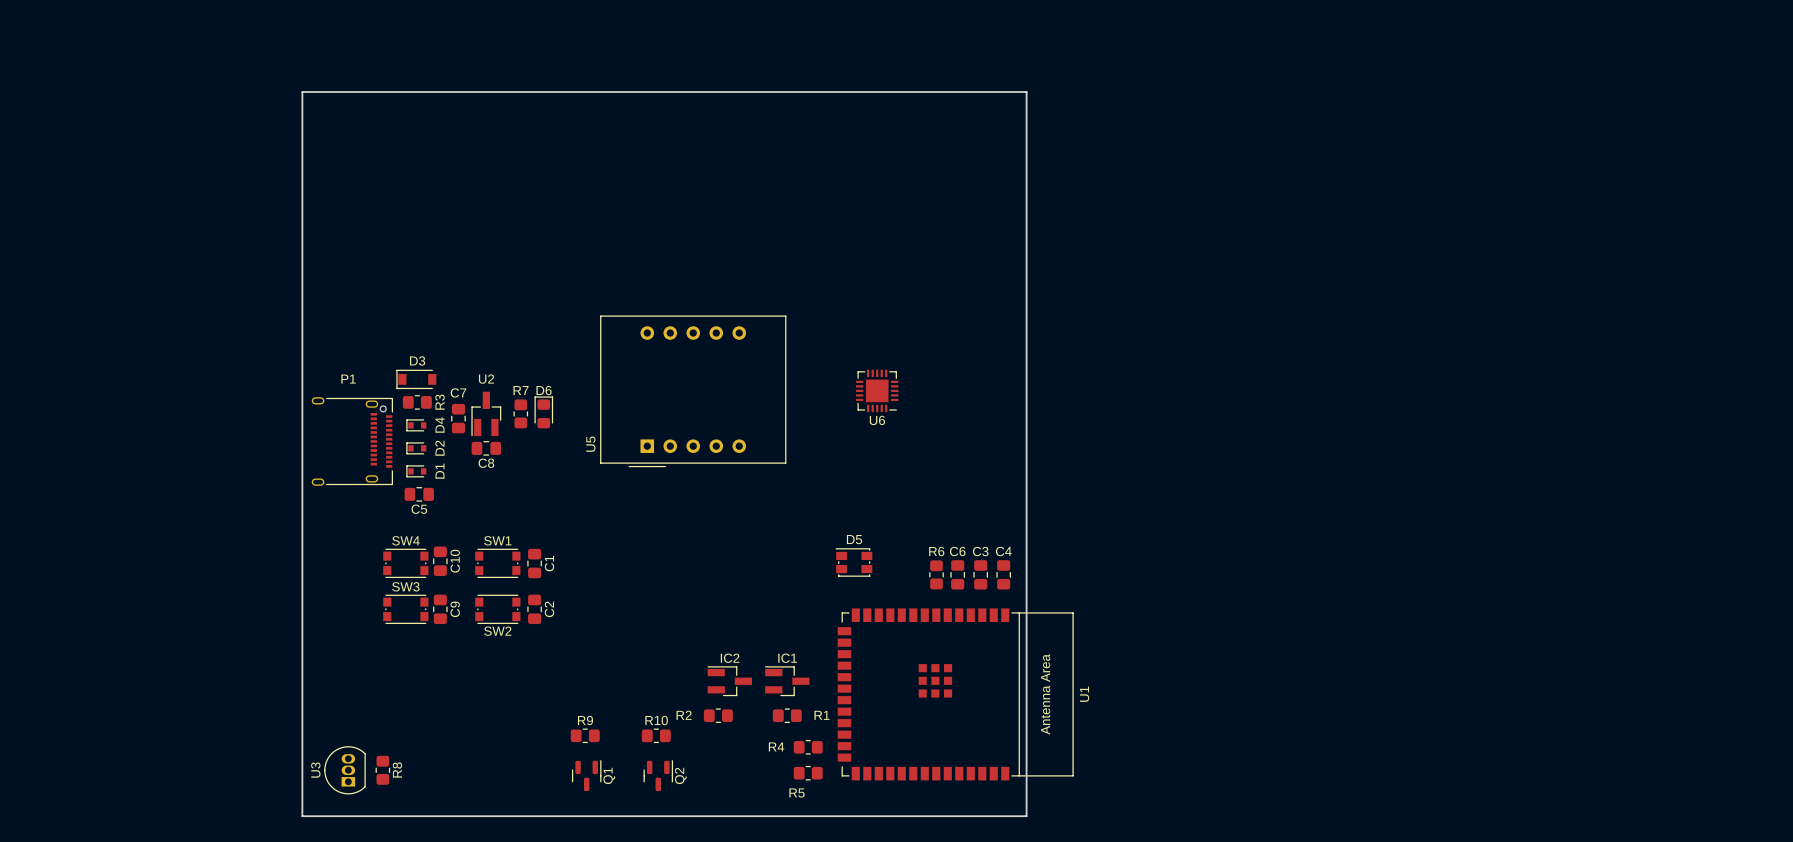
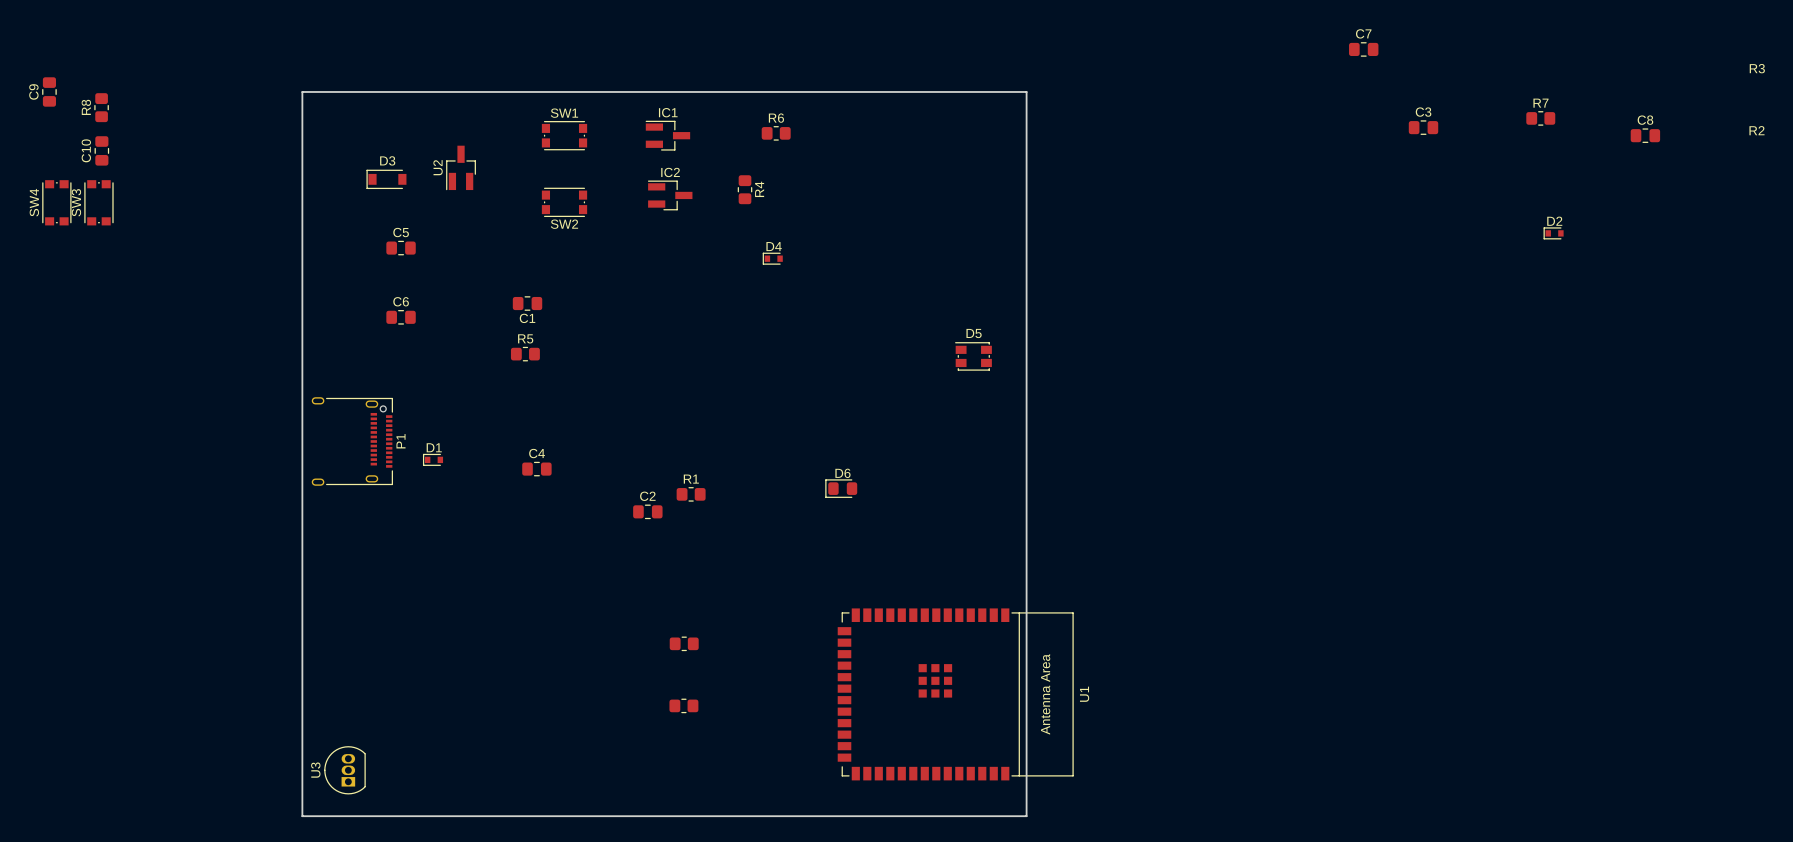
P1 name rotation: 0° (348, 379) -> 90° counterclockwise (401, 441)
P1 name position: P1 (348, 379) -> P1 (401, 441)
D3 position: (416, 379) -> (386, 179)
U2 name rotation: 0° (486, 379) -> 90° counterclockwise (438, 167)
U2 name position: U2 (486, 379) -> U2 (438, 167)
U6: (877, 390) -> none
U5: (693, 391) -> none
R3 position: (417, 402) -> (684, 643)
R3 name rotation: 0° (439, 402) -> 90° clockwise (1757, 68)
R3 name position: R3 (439, 402) -> R3 (1757, 68)
D6 rotation: 0° (543, 412) -> 90° counterclockwise (841, 488)
D6 position: (543, 412) -> (841, 488)
U2 position: (486, 413) -> (461, 167)
R7 rotation: 0° (520, 413) -> 90° clockwise (1540, 118)
R7 position: (520, 413) -> (1540, 118)
C7 rotation: 0° (458, 418) -> 90° clockwise (1363, 49)
C7 position: (458, 418) -> (1363, 49)
D4 position: (416, 425) -> (772, 258)
D4 name rotation: 0° (440, 425) -> 90° clockwise (774, 246)
D4 name position: D4 (440, 425) -> D4 (774, 246)
D2 position: (416, 448) -> (1553, 233)
D2 name rotation: 0° (439, 448) -> 90° clockwise (1554, 221)
D2 name position: D2 (439, 448) -> D2 (1554, 221)
C8 position: (486, 448) -> (1645, 135)
C8 name position: C8 (486, 463) -> C8 (1645, 120)
D1 position: (416, 471) -> (433, 459)
D1 name rotation: 0° (440, 471) -> 90° clockwise (434, 447)
D1 name position: D1 (440, 471) -> D1 (434, 447)
C5 position: (419, 494) -> (401, 248)
C5 name position: C5 (419, 509) -> C5 (401, 232)
SW4 name position: SW4 (405, 540) -> SW4 (34, 202)
C10 position: (440, 561) -> (101, 150)
C10 name position: C10 (455, 561) -> C10 (86, 150)
D5 position: (853, 562) -> (973, 356)
SW4 rotation: 0° (405, 563) -> 90° clockwise (56, 202)
SW4 position: (405, 563) -> (56, 202)
SW1 position: (497, 563) -> (564, 135)
C1 rotation: 0° (534, 563) -> 90° clockwise (527, 303)
C1 position: (534, 563) -> (527, 303)
R6 rotation: 0° (936, 574) -> 90° clockwise (776, 133)
R6 position: (936, 574) -> (776, 133)
C6 rotation: 0° (957, 574) -> 90° clockwise (401, 317)
C6 position: (957, 574) -> (401, 317)
C3 rotation: 0° (980, 574) -> 90° clockwise (1423, 127)
C3 position: (980, 574) -> (1423, 127)
C4 rotation: 0° (1003, 574) -> 90° clockwise (536, 469)
C4 position: (1003, 574) -> (536, 469)
SW3 name position: SW3 (405, 586) -> SW3 (76, 202)
SW3 rotation: 0° (405, 609) -> 90° clockwise (98, 202)
SW3 position: (405, 609) -> (98, 202)
C9 position: (440, 609) -> (49, 91)
C9 name position: C9 (455, 609) -> C9 (33, 91)
SW2 position: (497, 609) -> (564, 202)
C2 rotation: 0° (534, 609) -> 90° clockwise (647, 511)
C2 position: (534, 609) -> (647, 511)
C2 name position: C2 (549, 609) -> C2 (647, 496)
IC2 position: (729, 681) -> (670, 195)
IC1 position: (787, 681) -> (667, 135)
R2 name position: R2 (684, 715) -> R2 (1756, 130)
R2 position: (718, 715) -> (683, 705)
R1 position: (787, 715) -> (691, 494)
R1 name position: R1 (822, 715) -> R1 (691, 479)
R9: (585, 735) -> none
R10: (656, 735) -> none
R4 name position: R4 (776, 746) -> R4 (759, 189)
R4 rotation: 0° (808, 747) -> 90° clockwise (745, 189)
R4 position: (808, 747) -> (745, 189)
R8 position: (382, 770) -> (101, 107)
R8 name position: R8 (397, 770) -> R8 (86, 107)
R5 position: (808, 773) -> (525, 354)
Q1: (586, 775) -> none
Q2: (658, 775) -> none
R5 name position: R5 (797, 793) -> R5 (525, 338)

